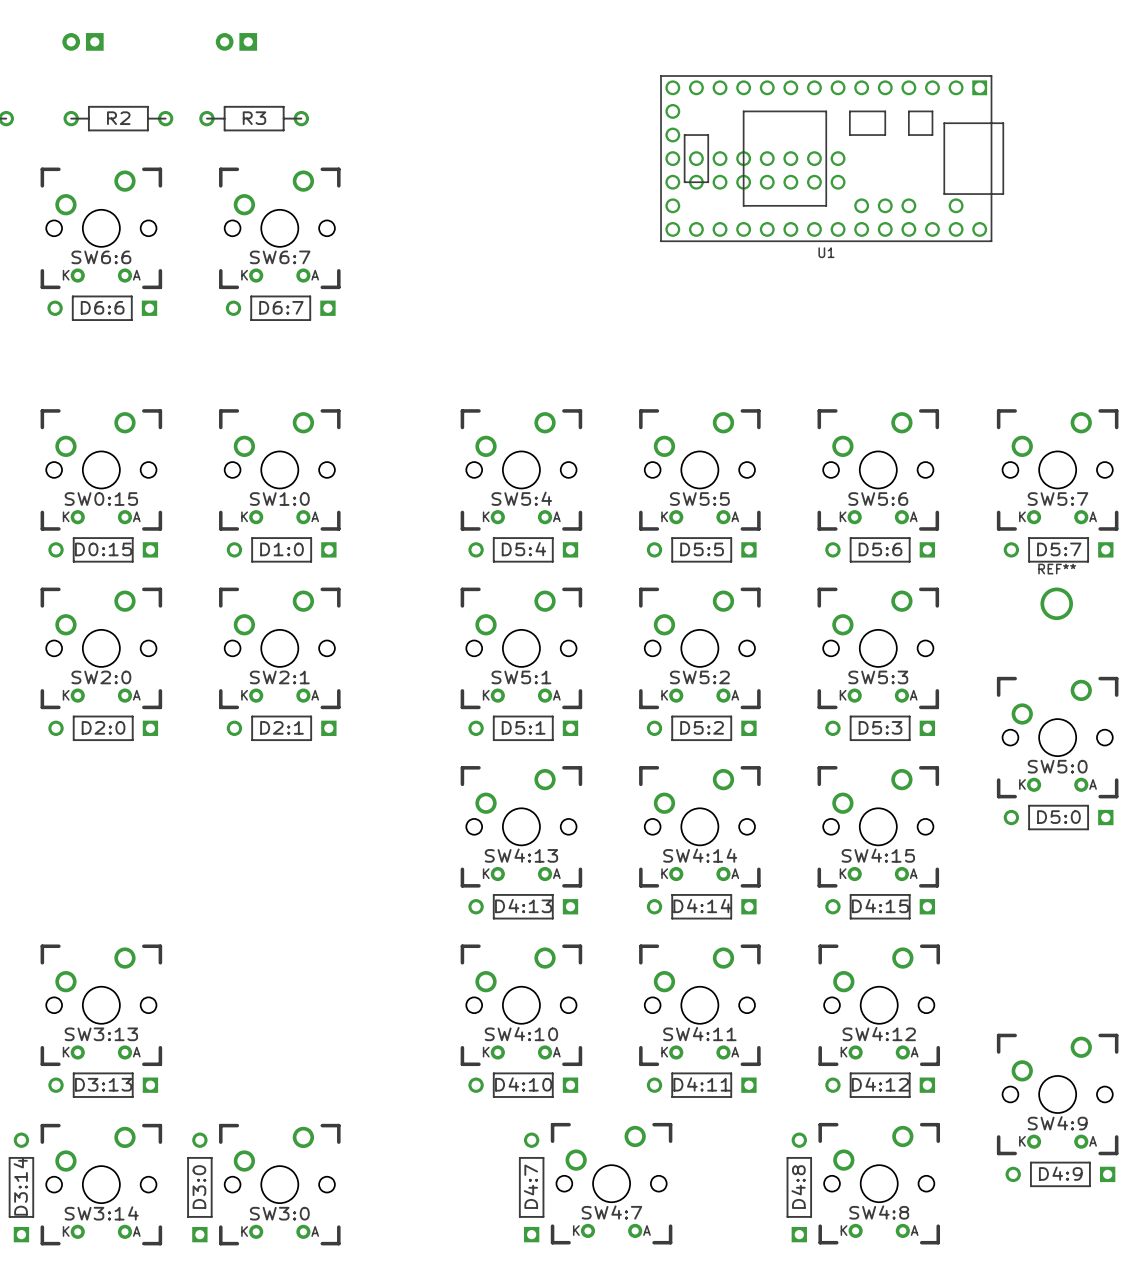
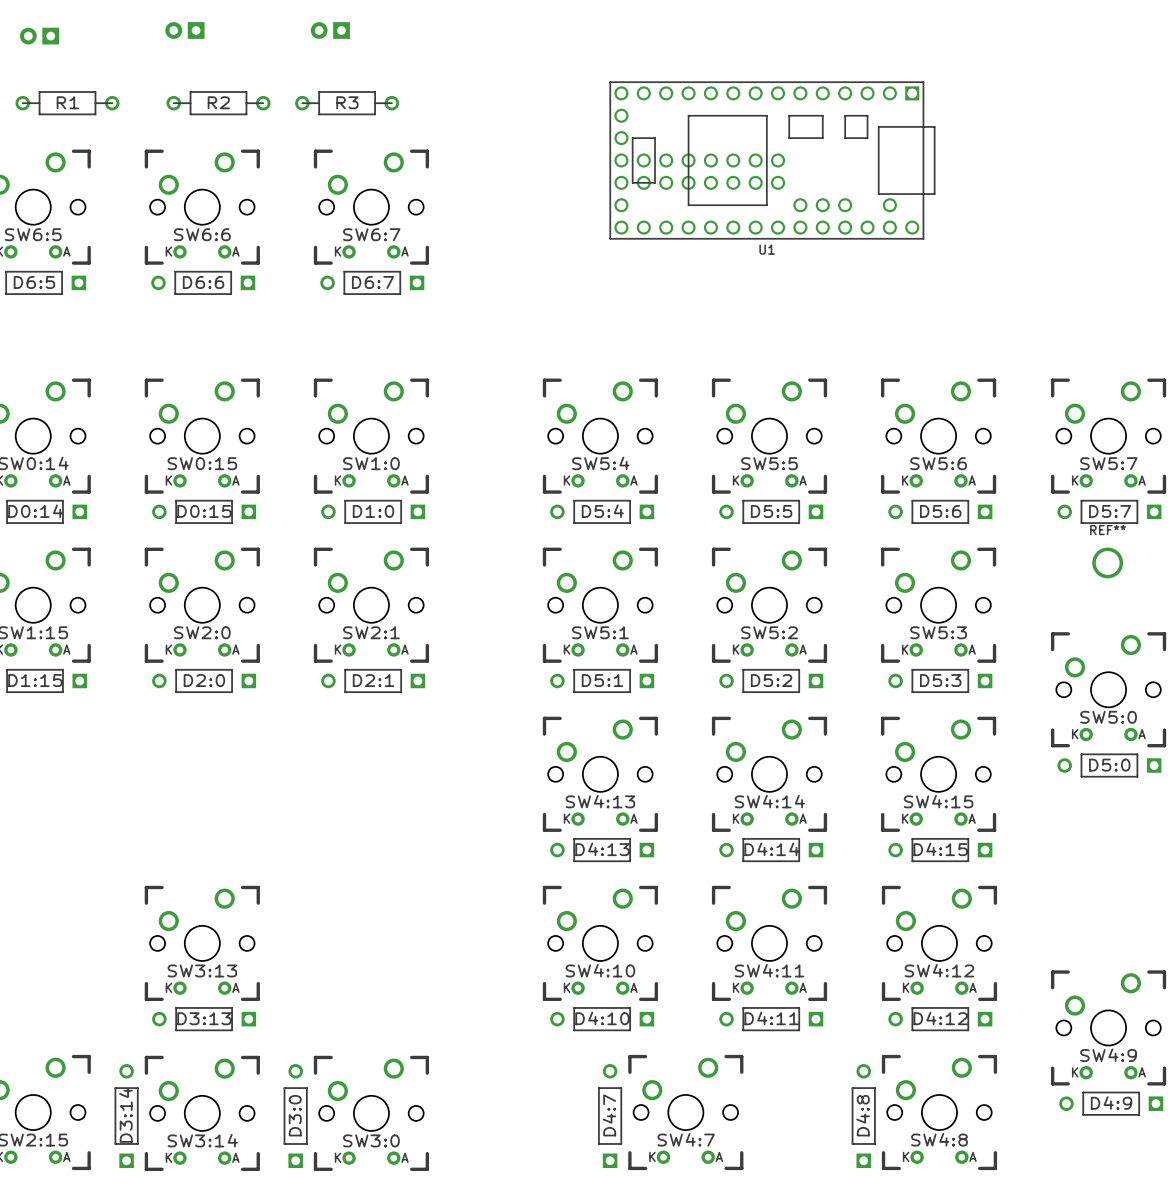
U1 position: (832, 158) -> (772, 160)

